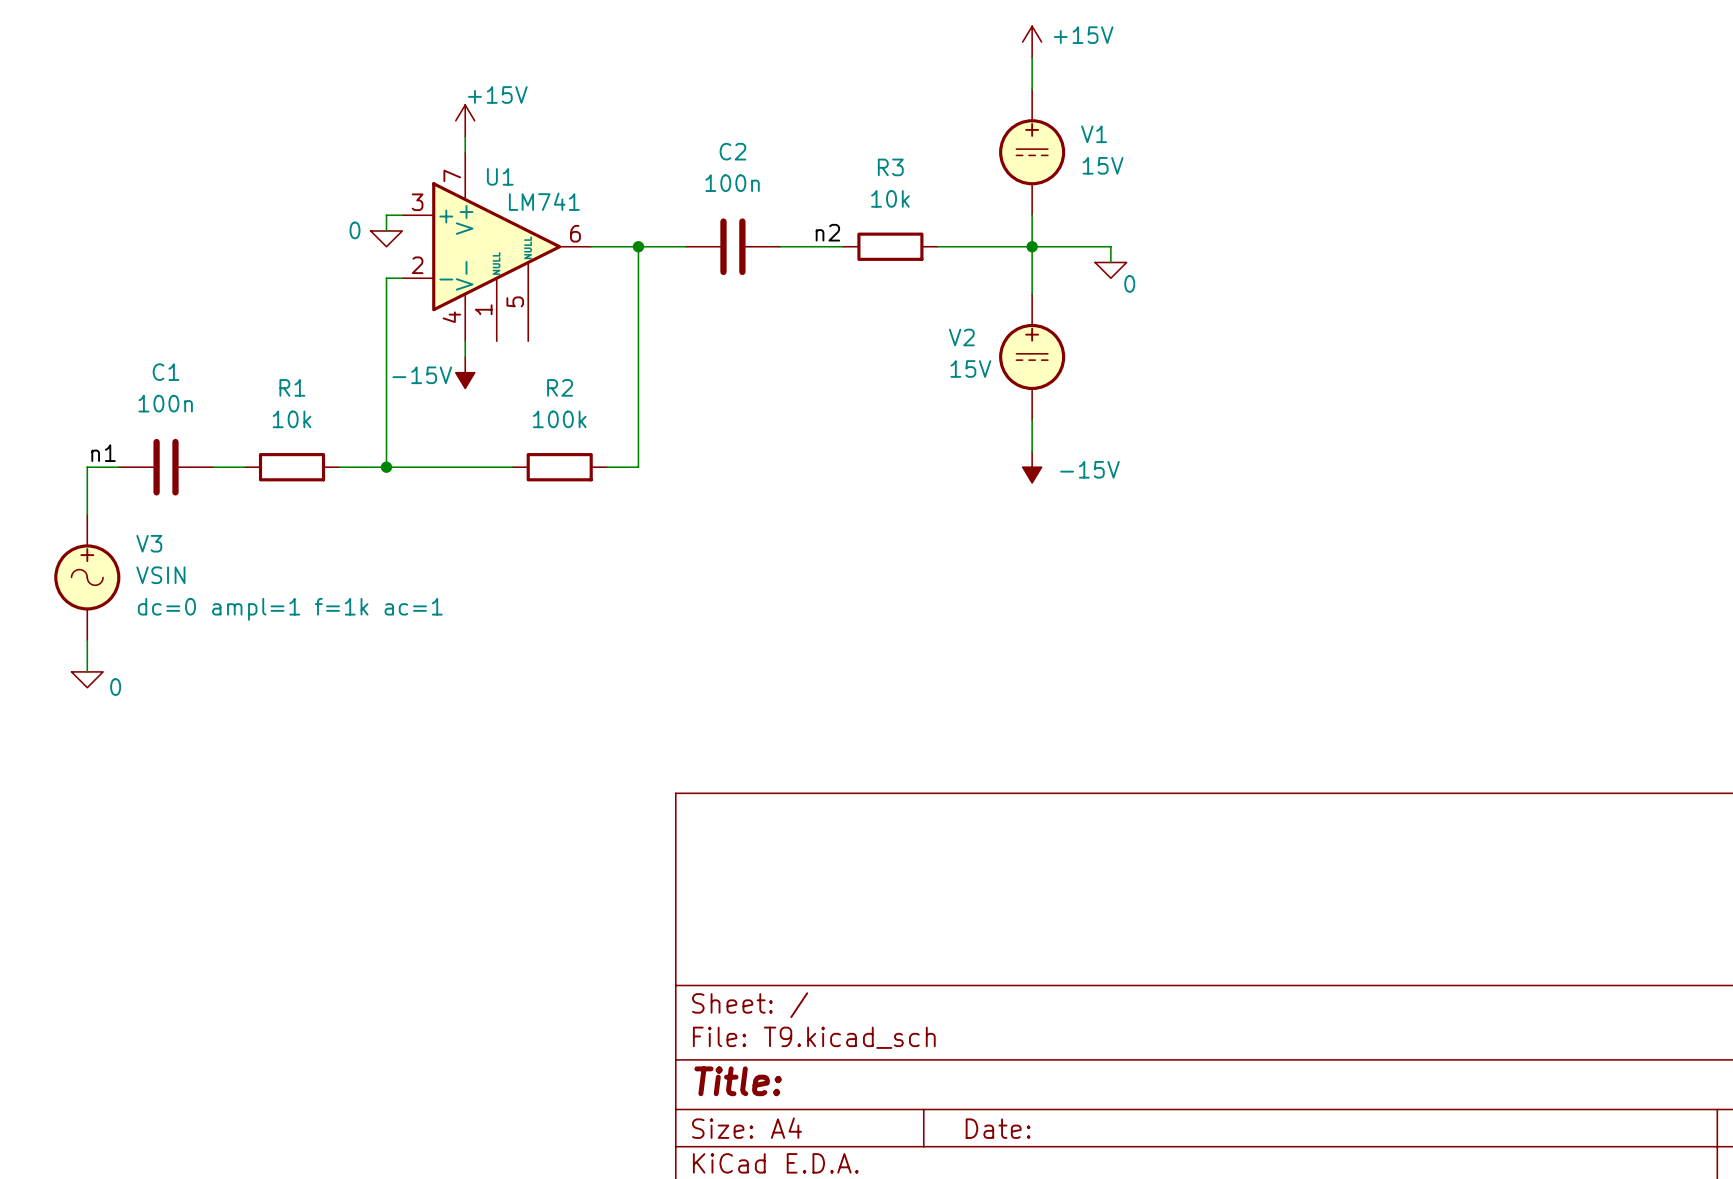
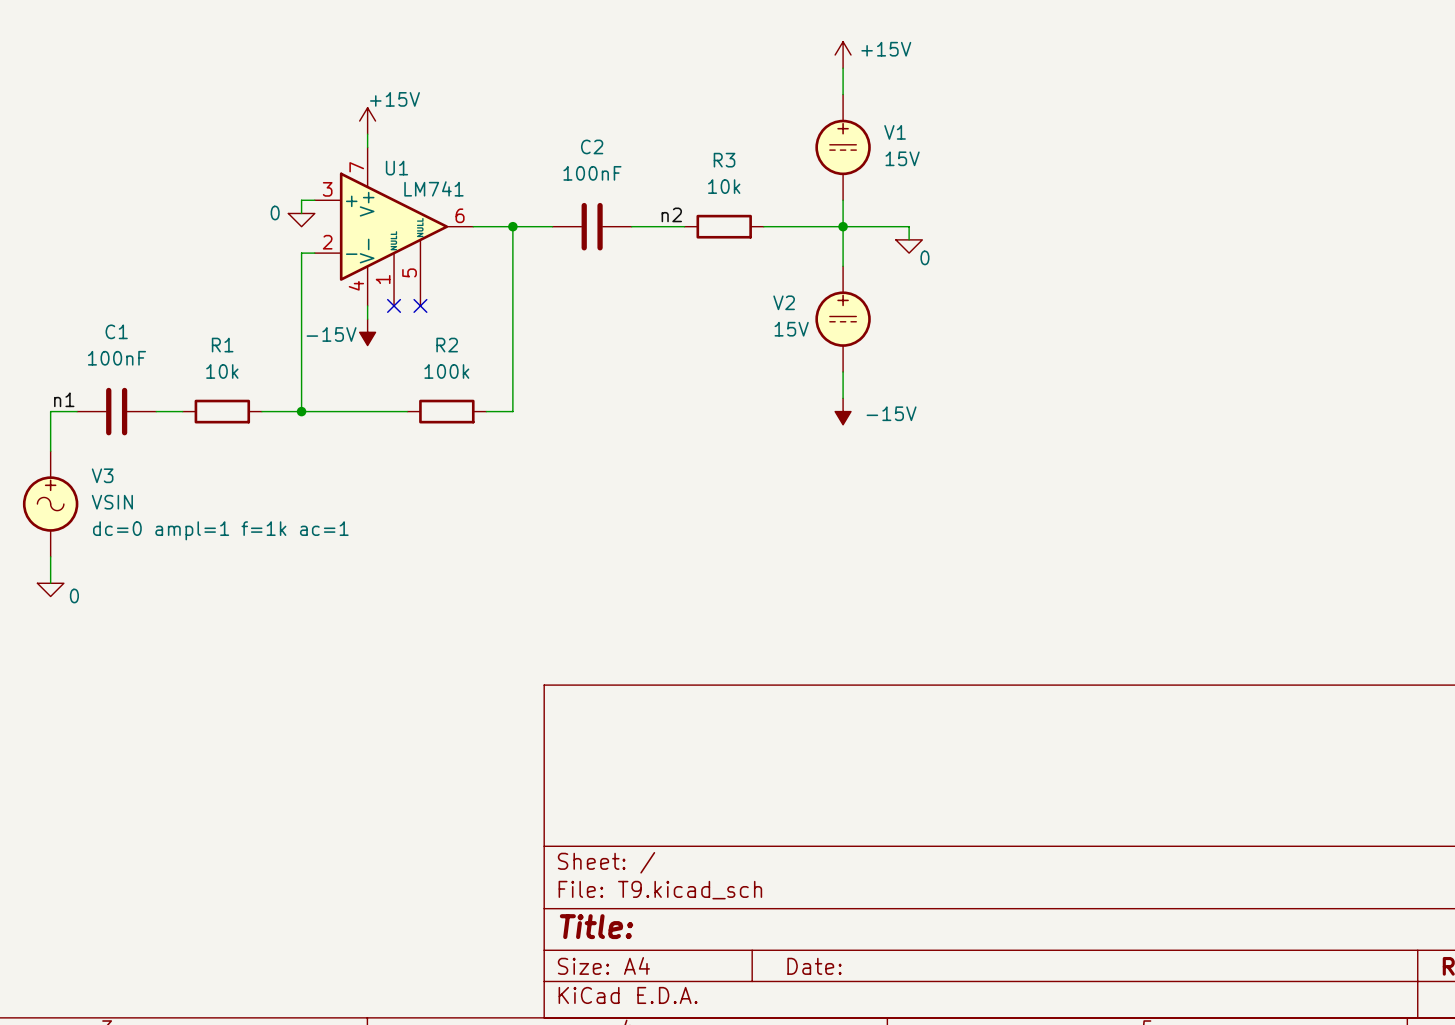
C2 value: 100n (732, 183) -> 100nF (592, 173)
no-connect mark: none -> (394, 305)
no-connect mark: none -> (420, 305)
C1 value: 100n (165, 403) -> 100nF (116, 358)

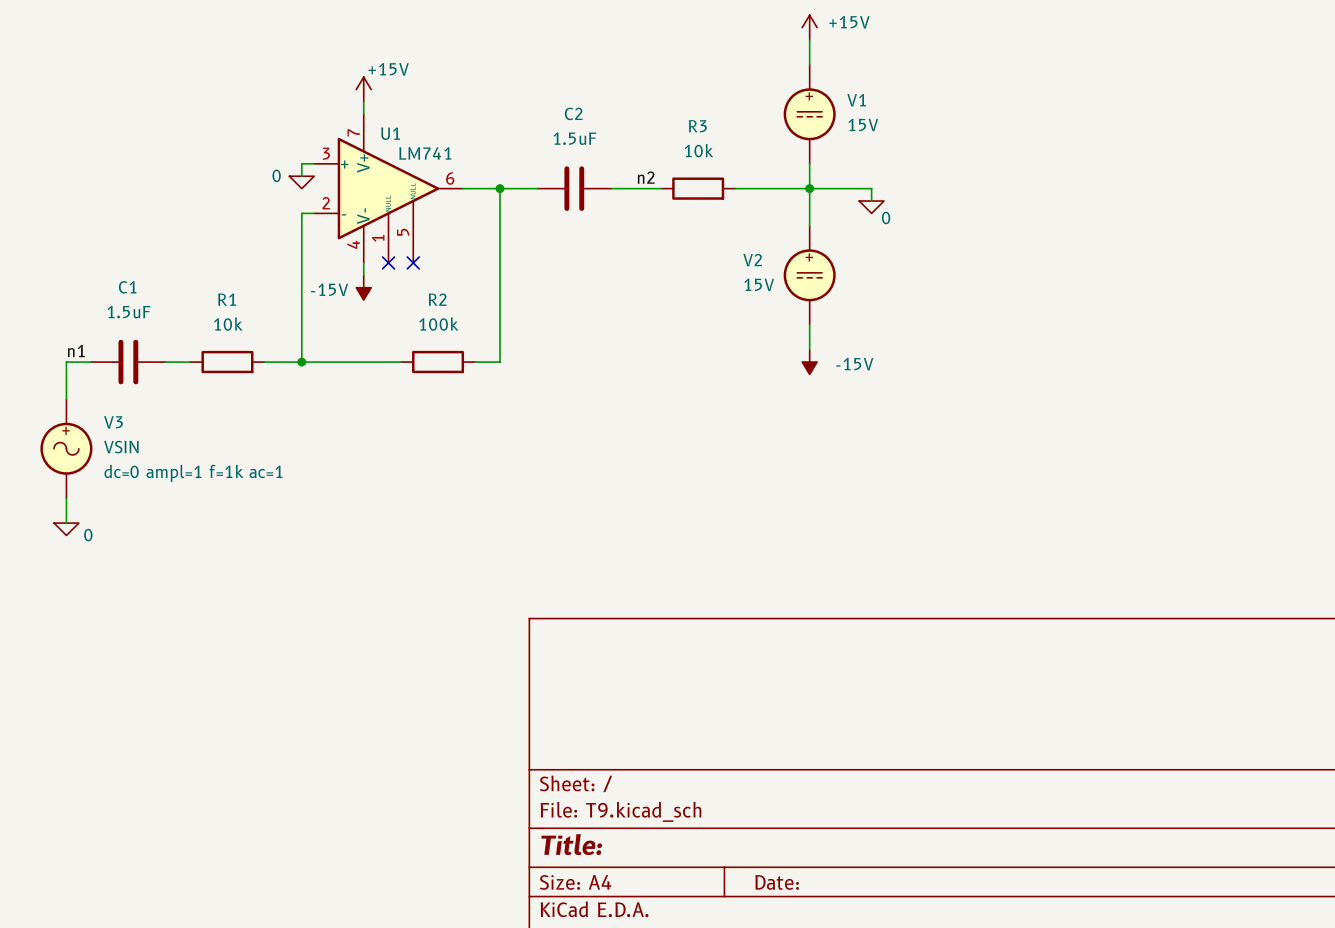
C2 value: 100nF (592, 173) -> 1.5uF (574, 138)
C1 value: 100nF (116, 358) -> 1.5uF (128, 312)

